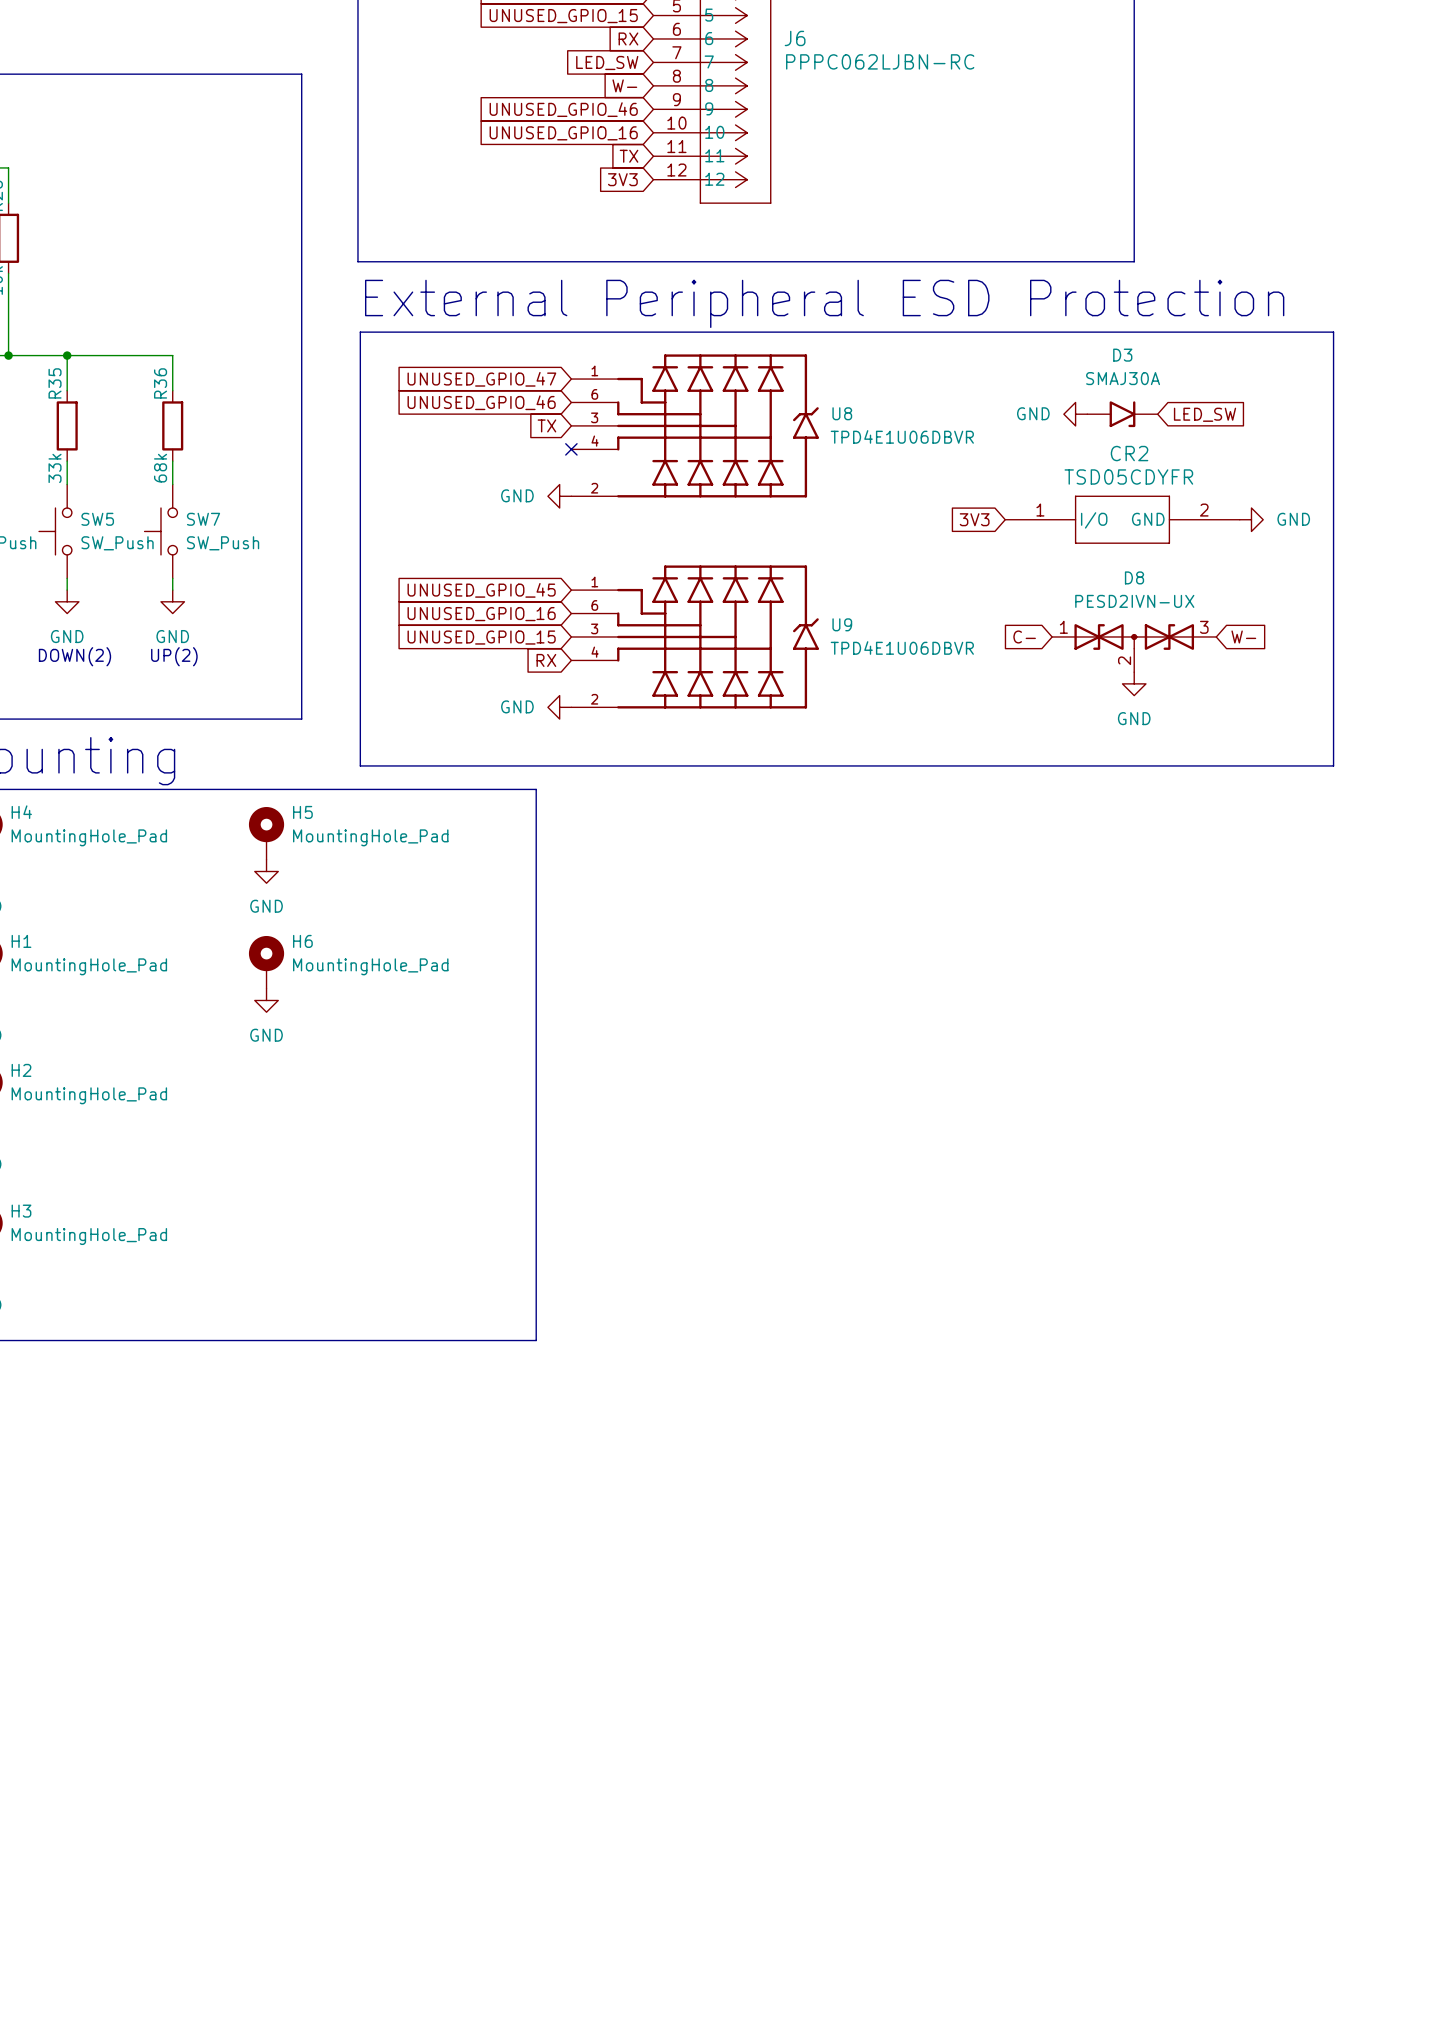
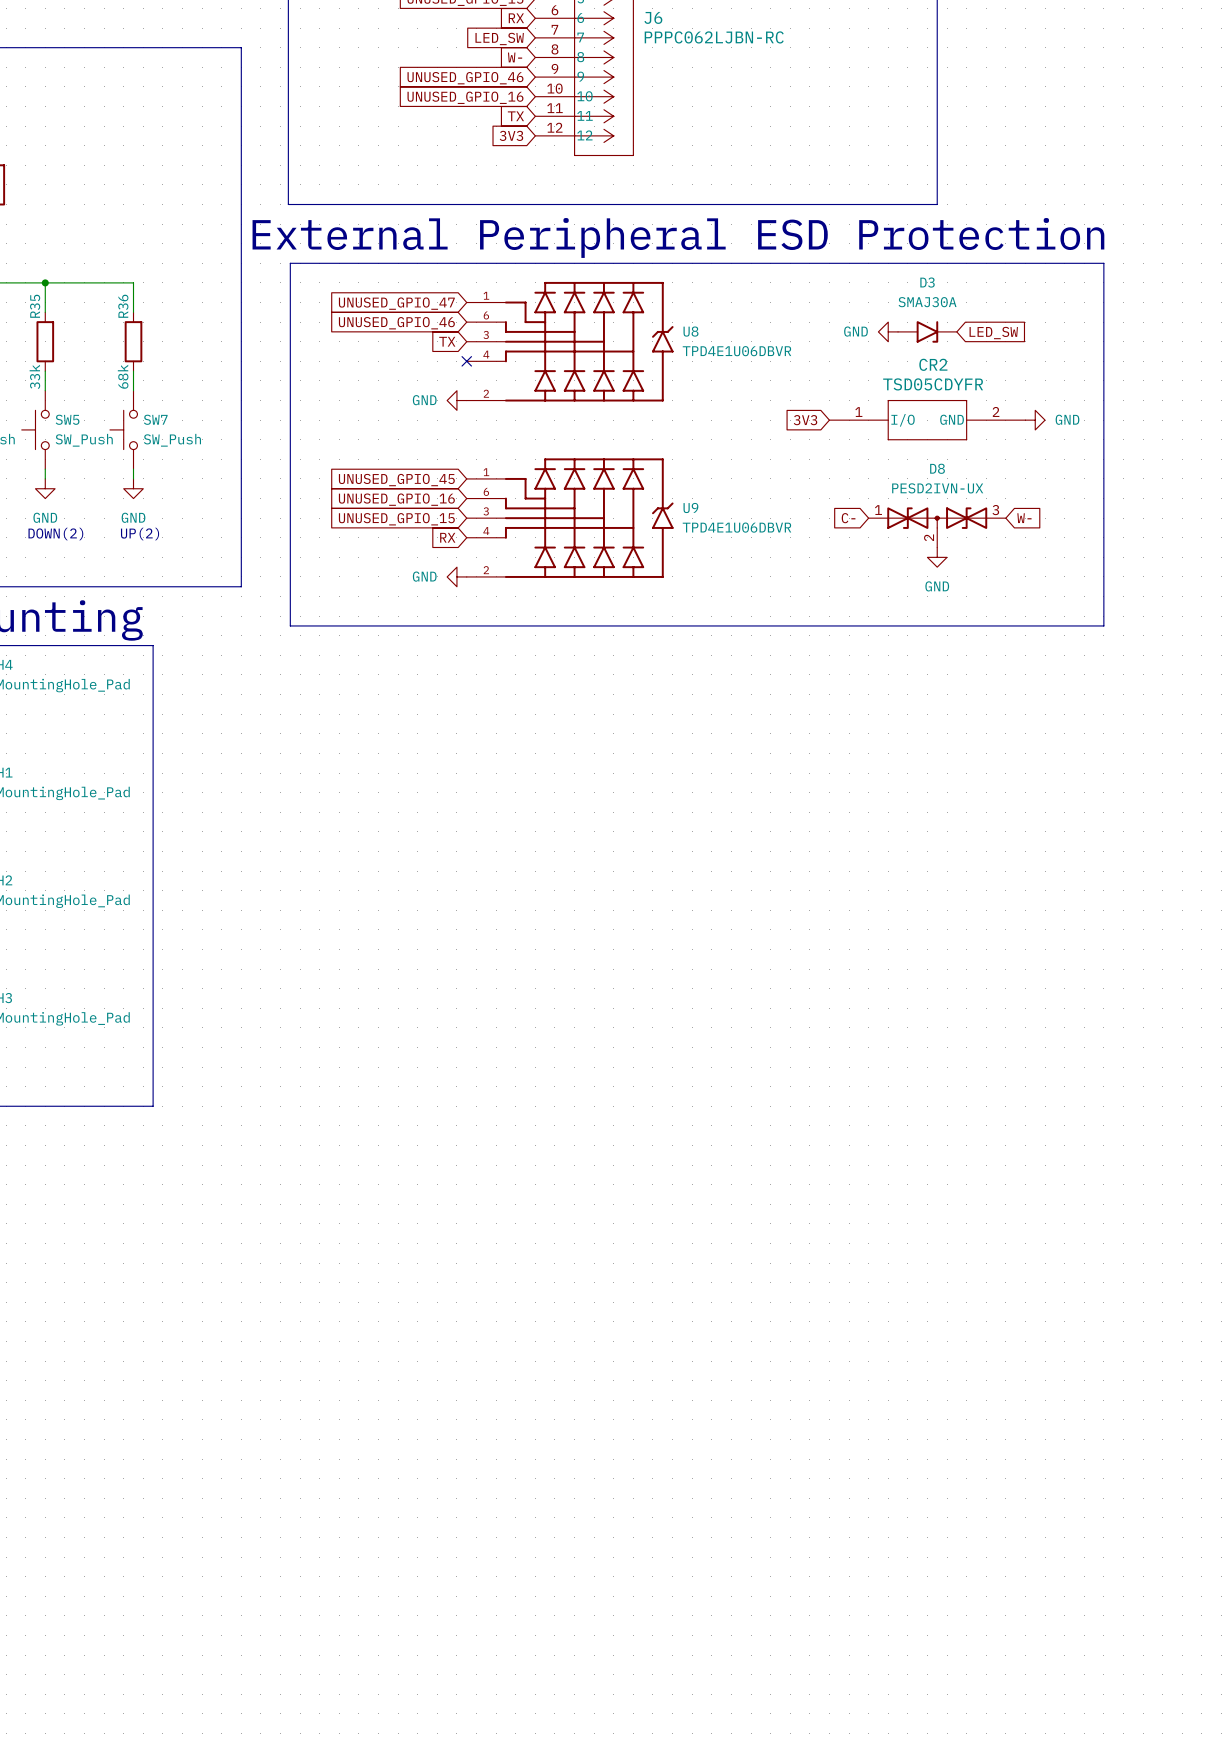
line: (196, 789) (536, 789) (536, 1340) (196, 1340) -> (153, 645) (153, 1106)
H5: MountingHole_Pad (266, 833) -> none
power symbol: GND (266, 871) -> none
H6: MountingHole_Pad (266, 962) -> none
power symbol: GND (266, 1000) -> none

